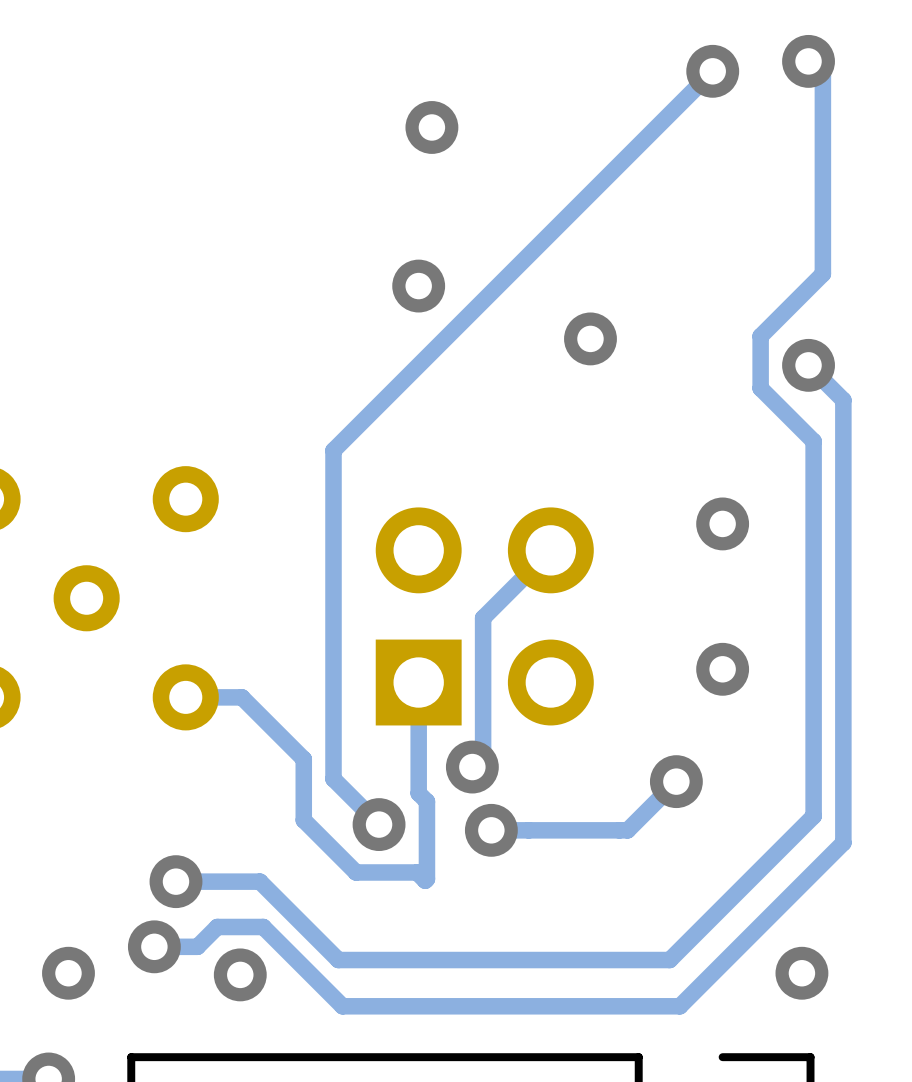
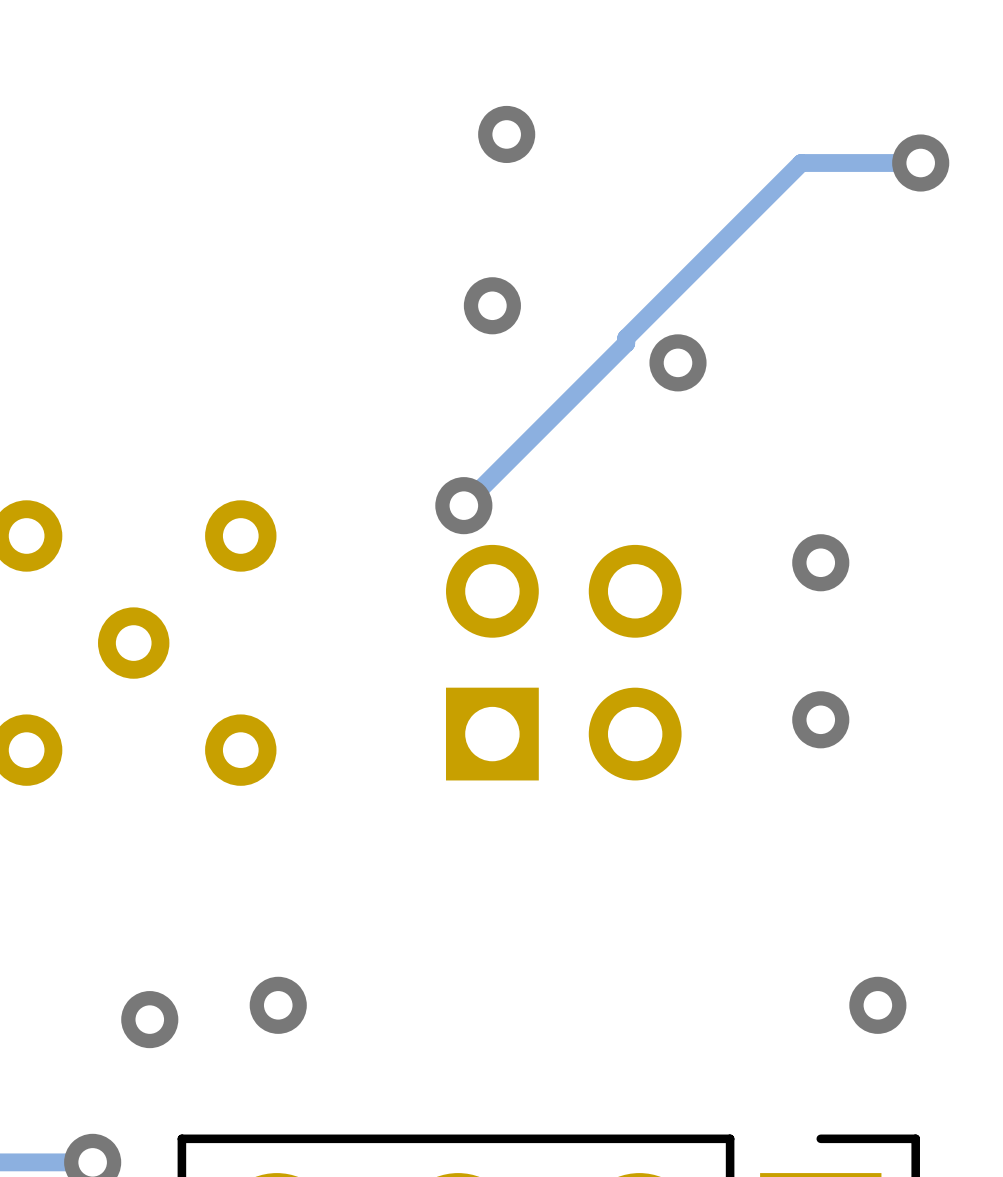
track: (808, 61) (822, 75) (822, 273) (760, 336) (760, 388) (813, 441) (813, 816) (669, 960) (338, 960) (259, 881) (175, 881) -> none
via: (808, 61) -> none
track: (712, 71) (333, 450) (333, 779) (379, 824) -> none
via: (712, 71) -> none
track: none -> (920, 163) (801, 163) (626, 338) (626, 343) (463, 505)
via: none -> (920, 163)
track: (808, 365) (843, 400) (843, 842) (679, 1006) (342, 1006) (263, 926) (217, 926) (197, 946) (154, 946) -> none
via: (808, 365) -> none
via: none -> (463, 505)
track: (550, 550) (483, 618) (483, 756) (472, 767) -> none
track: (418, 682) (418, 793) (426, 801) (426, 879) (425, 880) (417, 872) (356, 872) (303, 820) (303, 759) (241, 697) (185, 697) -> none
via: (472, 767) -> none
track: (676, 781) (627, 830) (491, 830) -> none
via: (676, 781) -> none
via: (379, 824) -> none
via: (491, 830) -> none
via: (175, 881) -> none
via: none -> (278, 1005)
via: none -> (149, 1019)
via: (154, 946) -> none
via: (68, 973) -> none
via position: (801, 973) -> (877, 1005)
via: (240, 974) -> none

